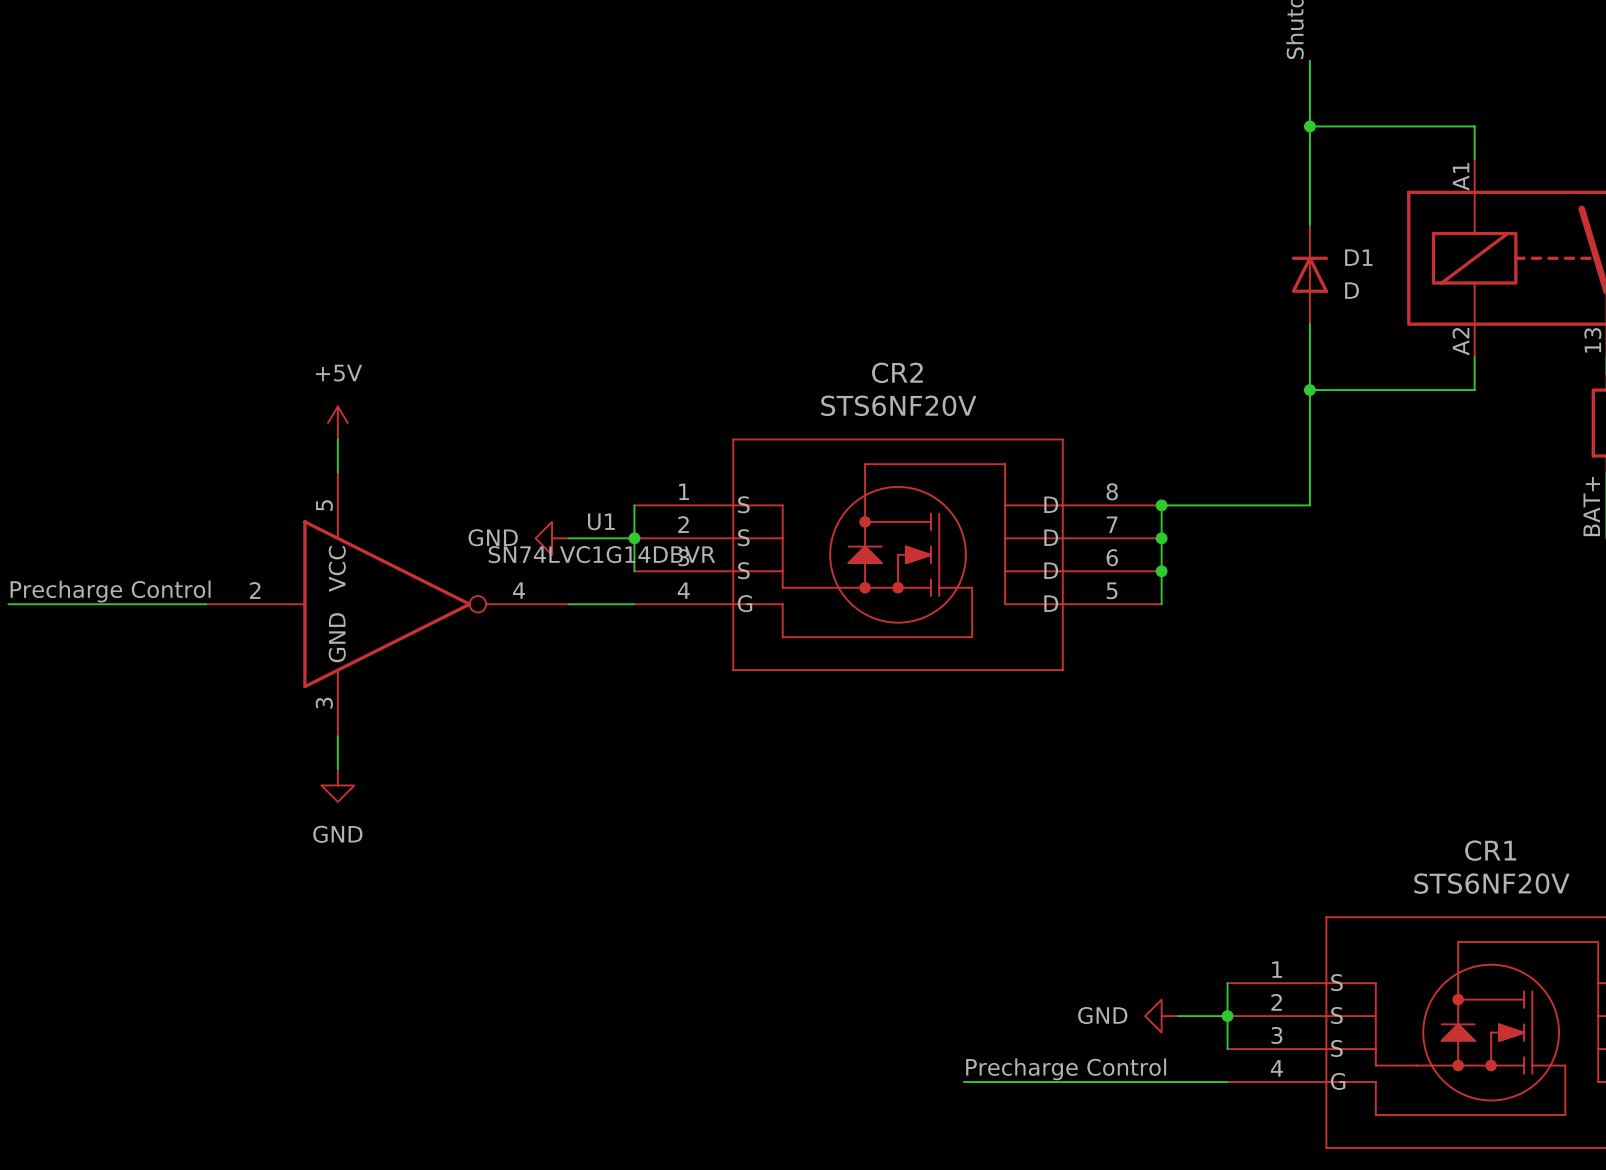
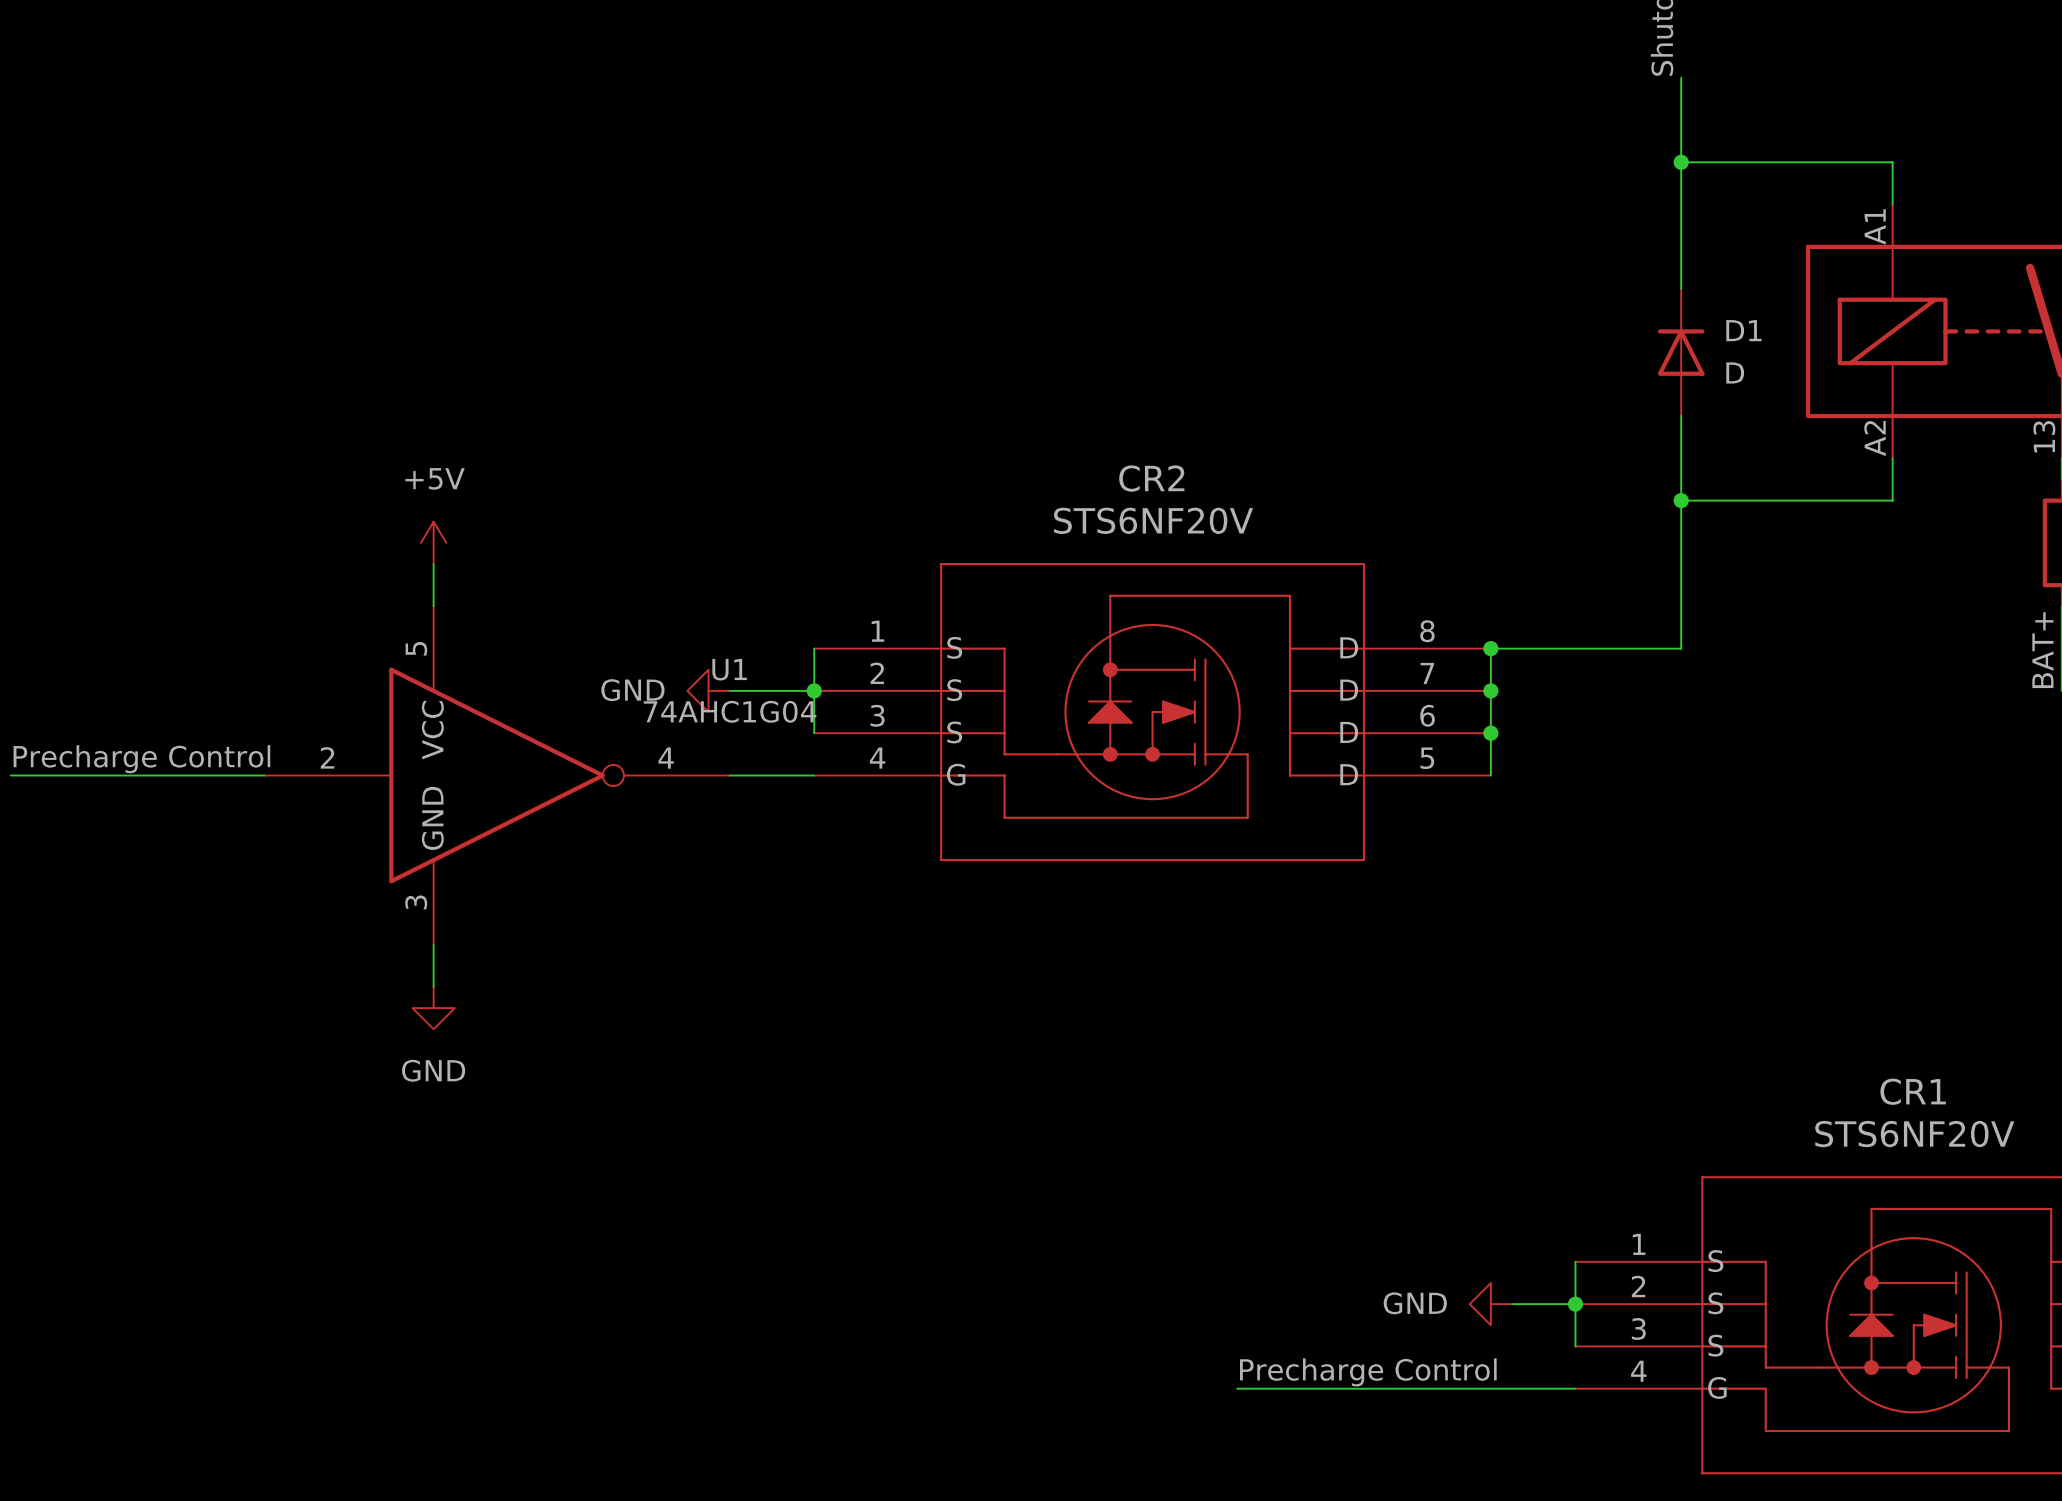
U1 name position: U1 (601, 521) -> U1 (729, 669)
U1 value: SN74LVC1G14DBVR (601, 554) -> 74AHC1G04 (730, 711)

